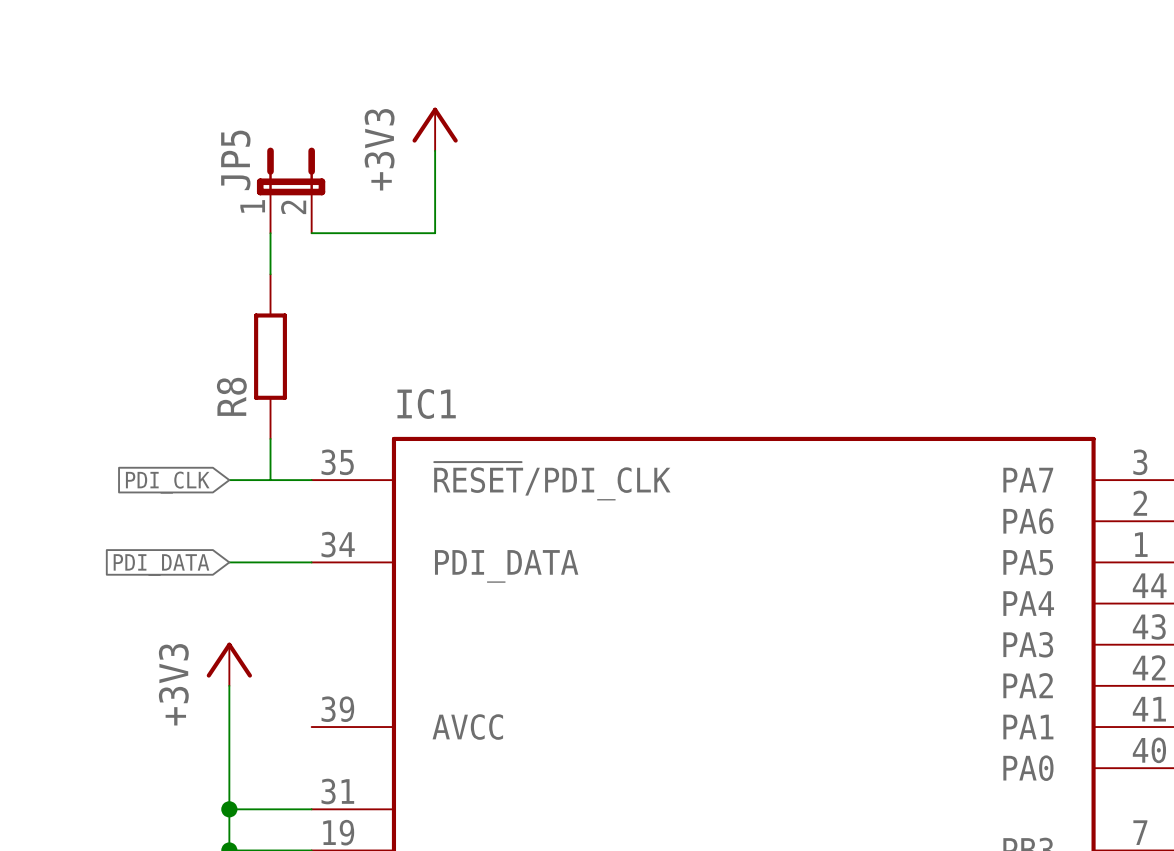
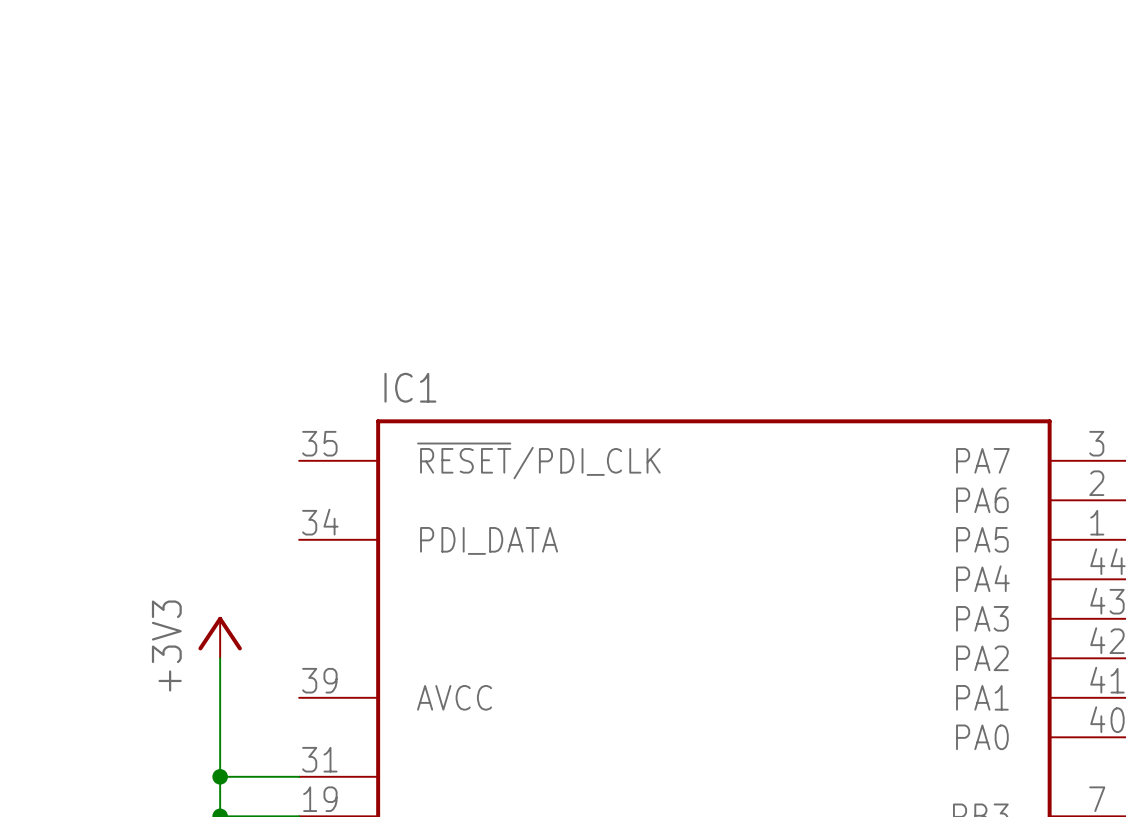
power symbol: +3V3 (435, 129) -> none
wire: (435, 150) (435, 233) (311, 233) -> none
JP5: (291, 190) -> none
wire: (270, 233) (270, 274) -> none
R8: (270, 356) -> none
wire: (270, 438) (270, 480) -> none
wire: (229, 480) (311, 480) -> none
global label: PDI_CLK (167, 482) -> none
wire: (229, 562) (311, 562) -> none
global label: PDI_DATA (161, 565) -> none

